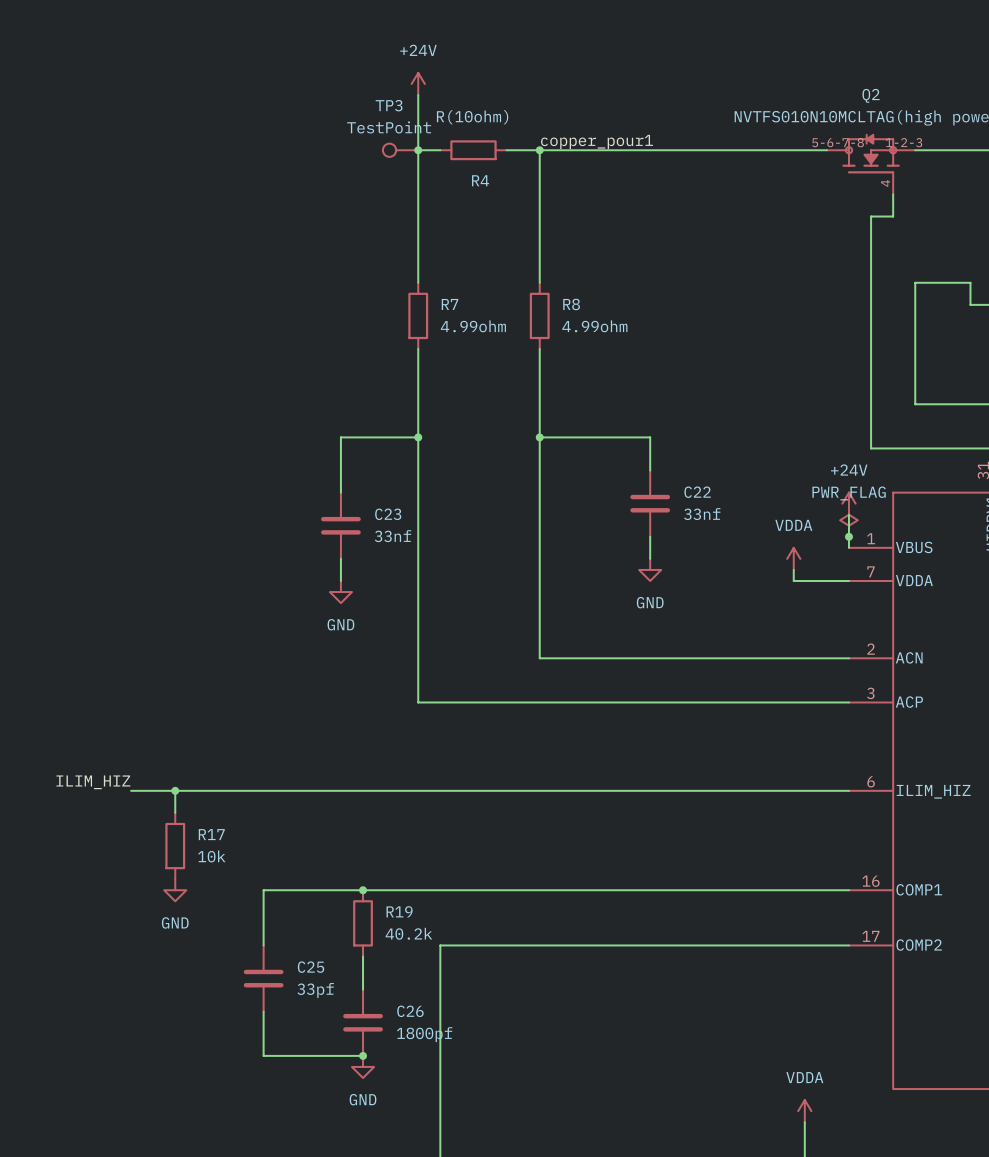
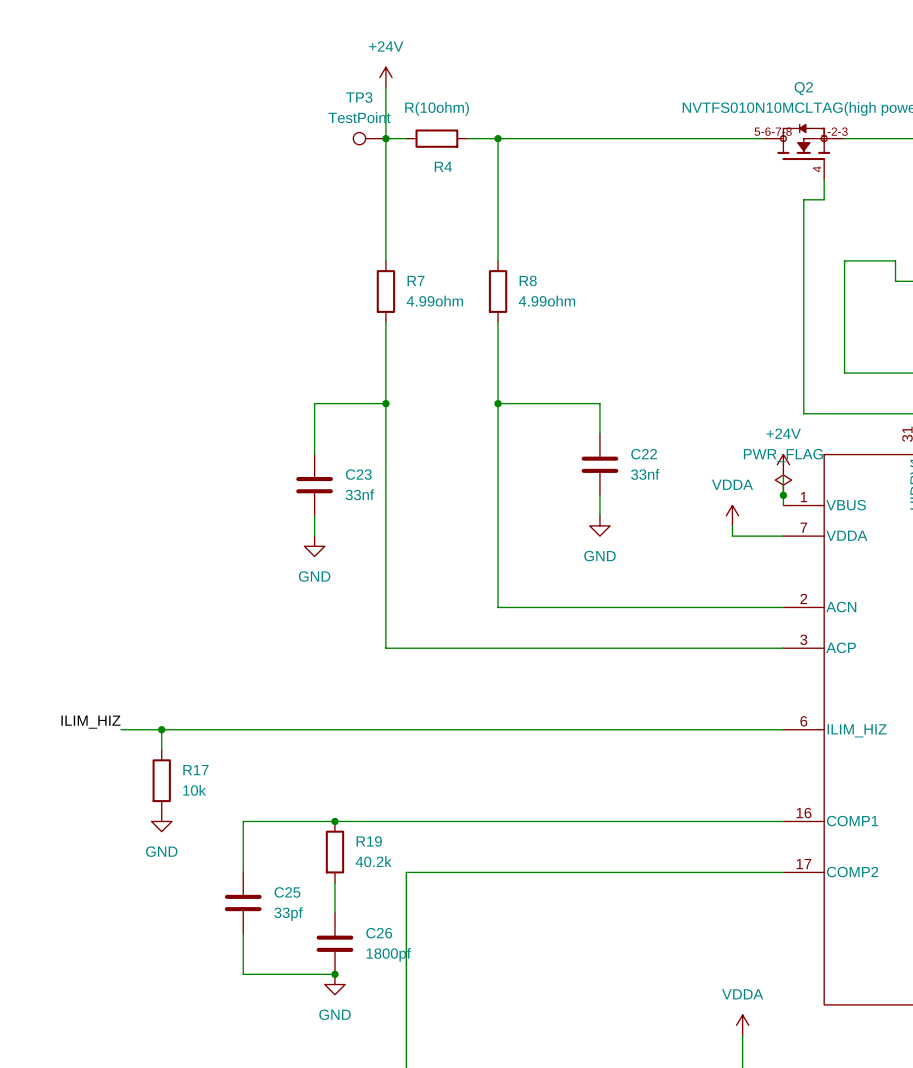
label: copper_pour1 (597, 141) -> none

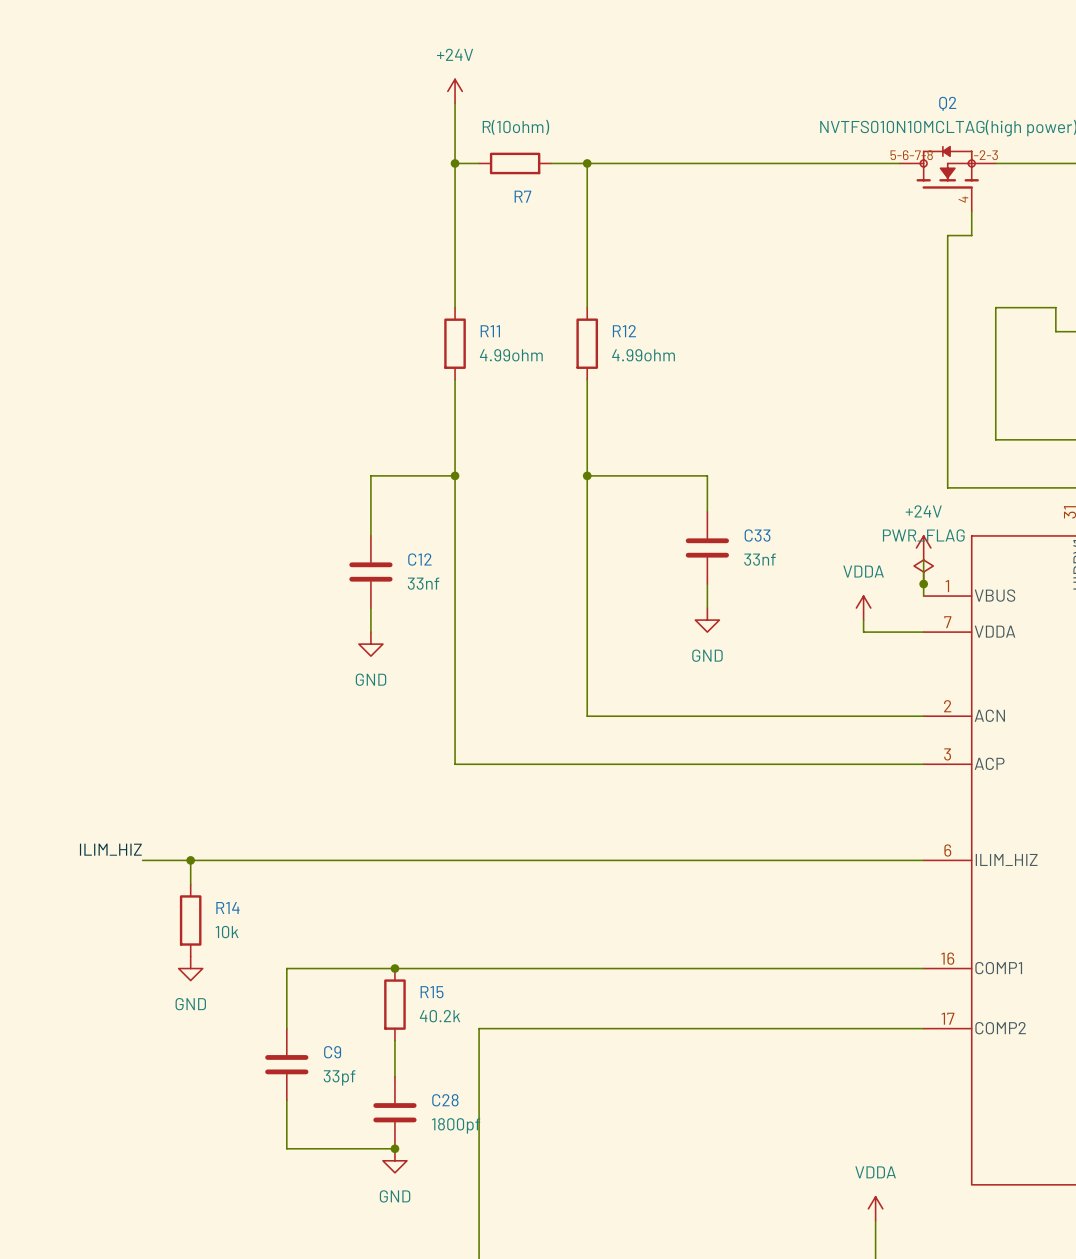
TP3: TestPoint (369, 138) -> none
R4 name: R4 (443, 166) -> R7 (522, 196)
R7 name: R7 (416, 280) -> R11 (490, 331)
R8 name: R8 (528, 280) -> R12 (624, 331)
C22 name: C22 (644, 454) -> C33 (757, 535)
C23 name: C23 (358, 474) -> C12 (419, 559)
R17 name: R17 (195, 770) -> R14 (227, 908)
R19 name: R19 (369, 841) -> R15 (432, 992)
C25 name: C25 (287, 892) -> C9 (332, 1052)
C26 name: C26 (379, 933) -> C28 (445, 1100)

